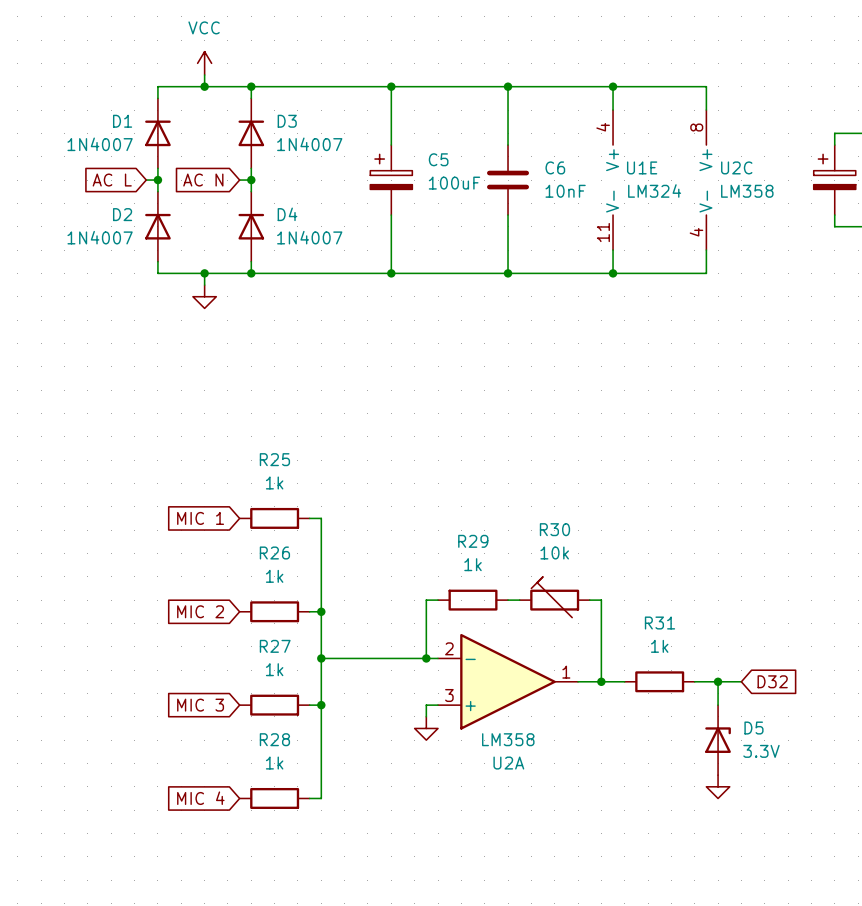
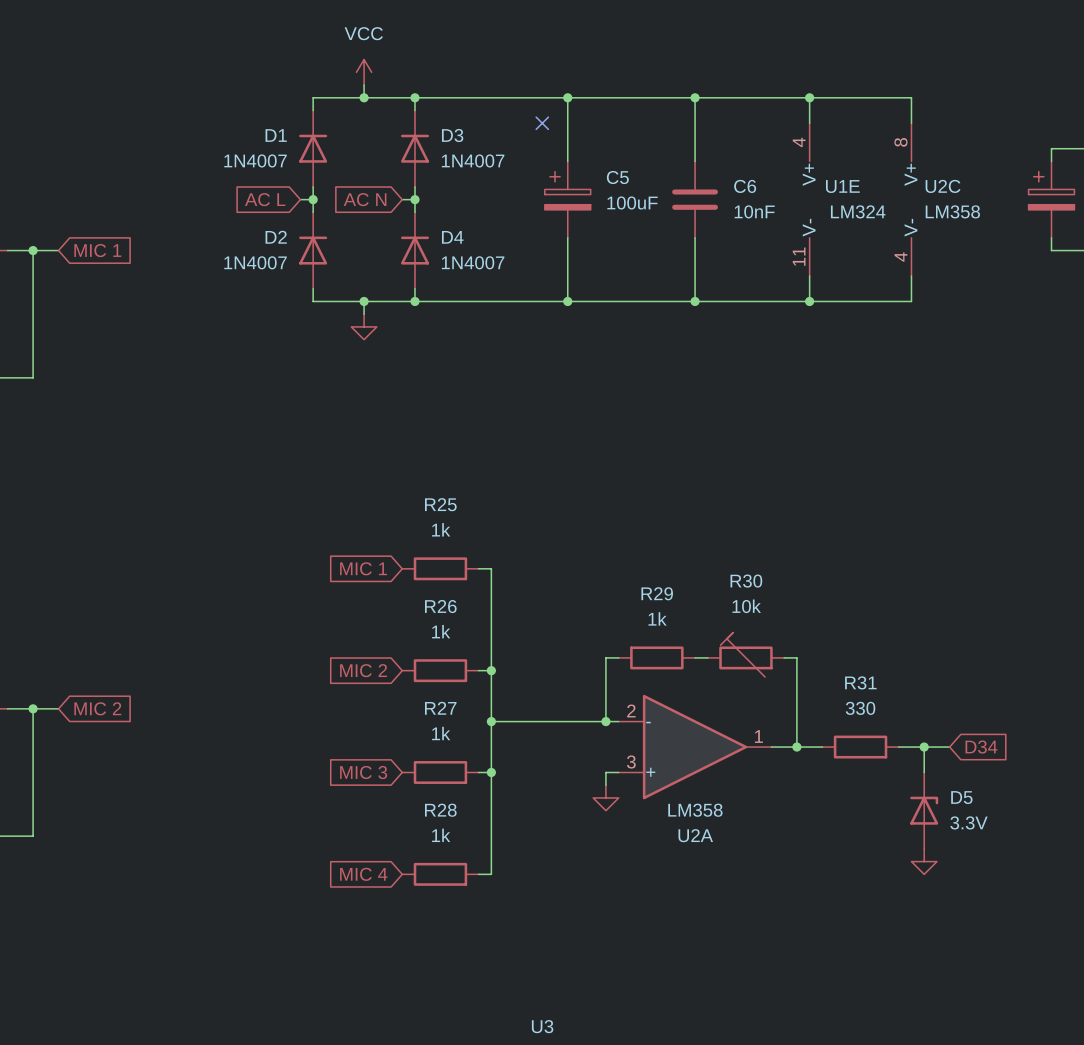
no-connect mark: none -> (542, 123)
R31 value: 1k (659, 646) -> 330 (860, 708)
global label: D32 (772, 681) -> D34 (981, 747)

